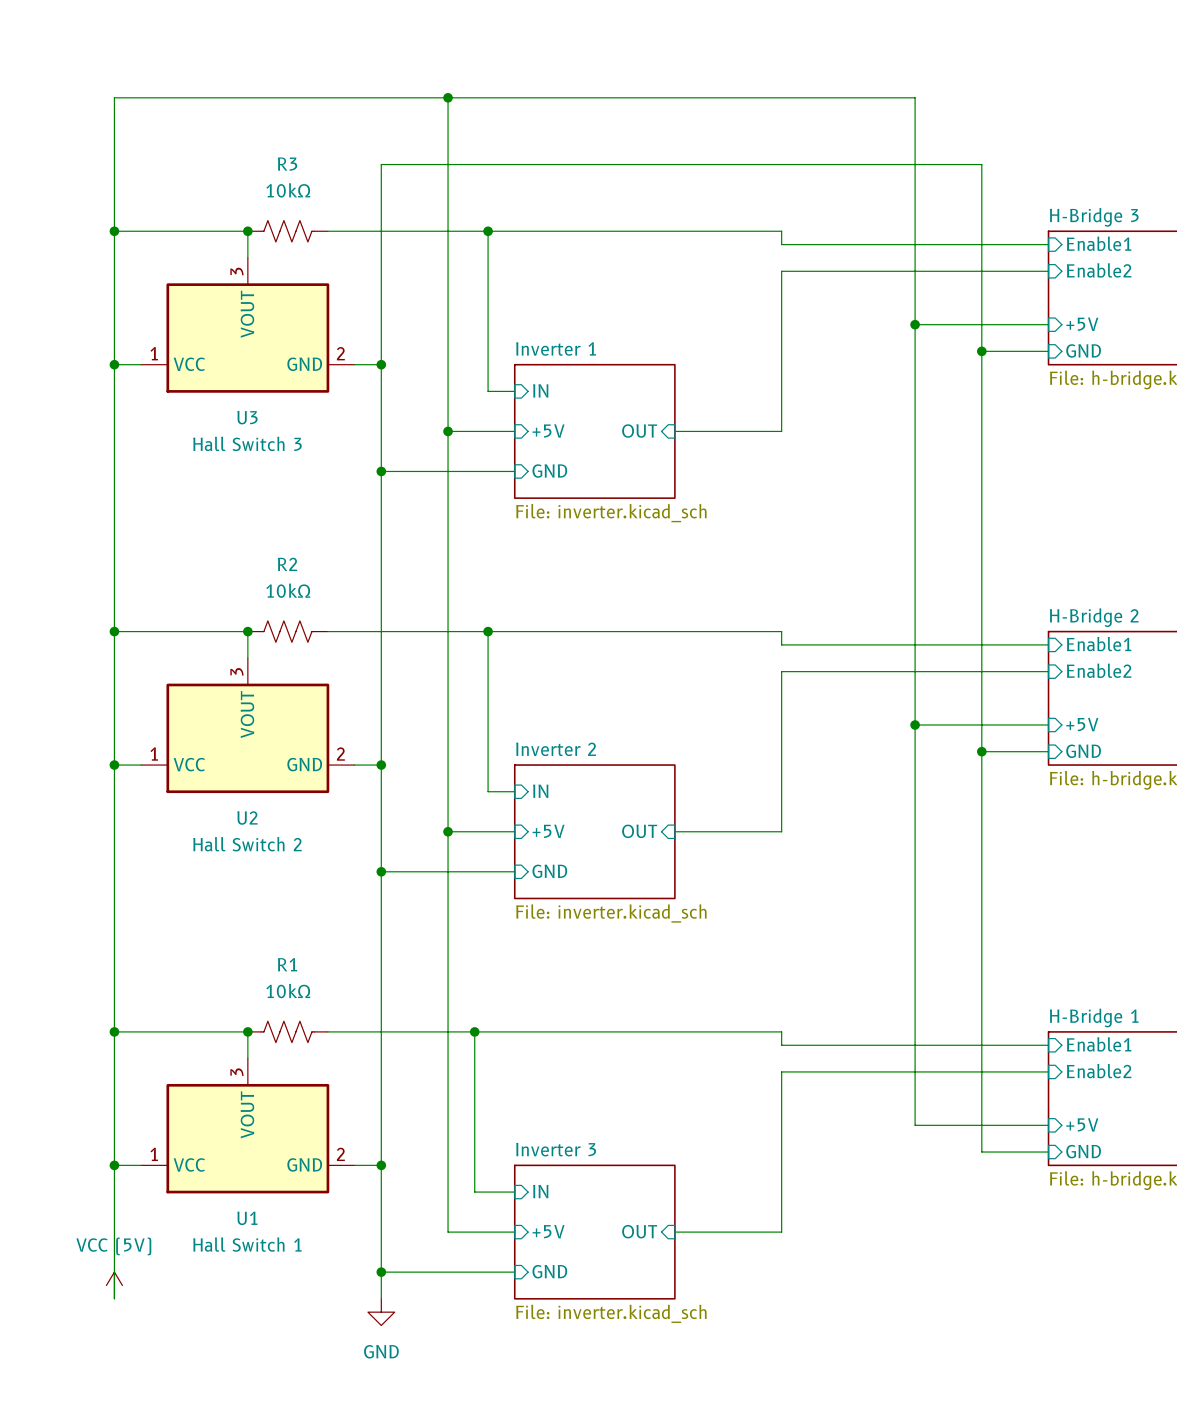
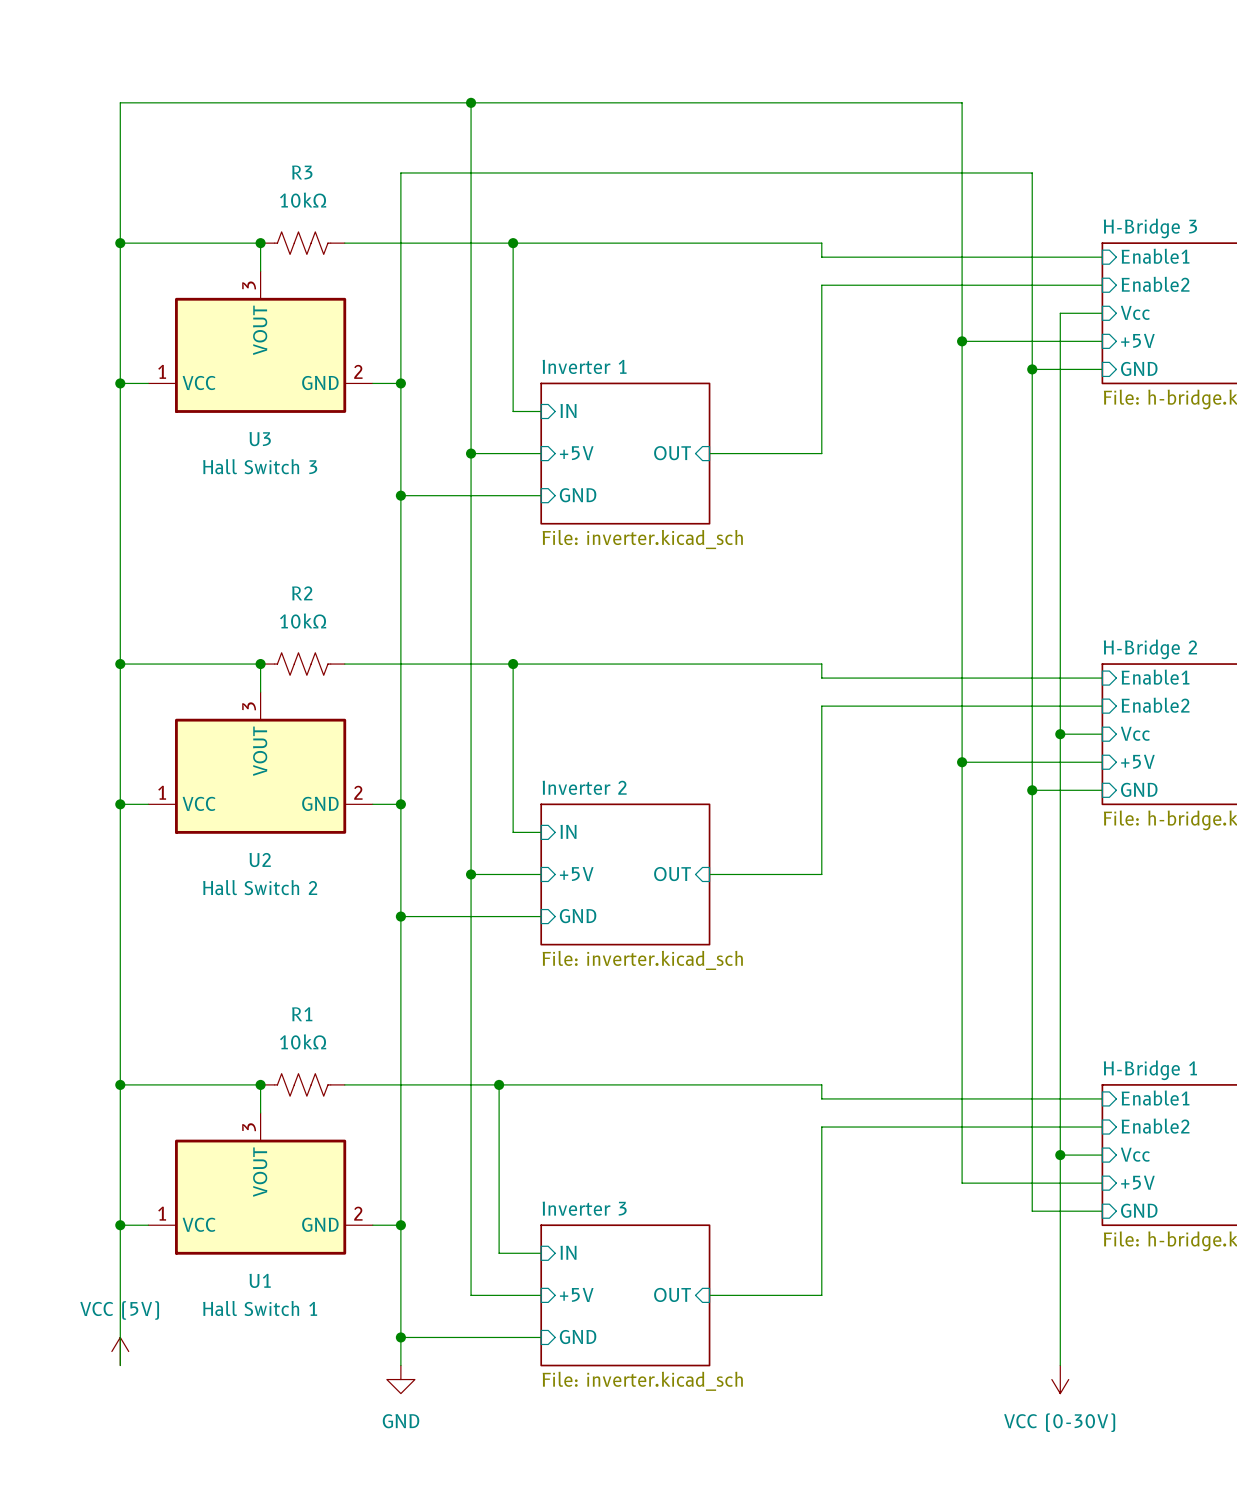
wire: none -> (1102, 313) (1060, 313) (1060, 1365)
sheet pin: none -> Vcc (1135, 312)
sheet pin: none -> Vcc (1135, 733)
wire: none -> (1060, 734) (1102, 734)
junction: none -> (1060, 734)
wire: none -> (1060, 1155) (1102, 1155)
junction: none -> (1060, 1155)
sheet pin: none -> Vcc (1135, 1154)
power symbol: none -> VCC (0-30V) (1060, 1379)

